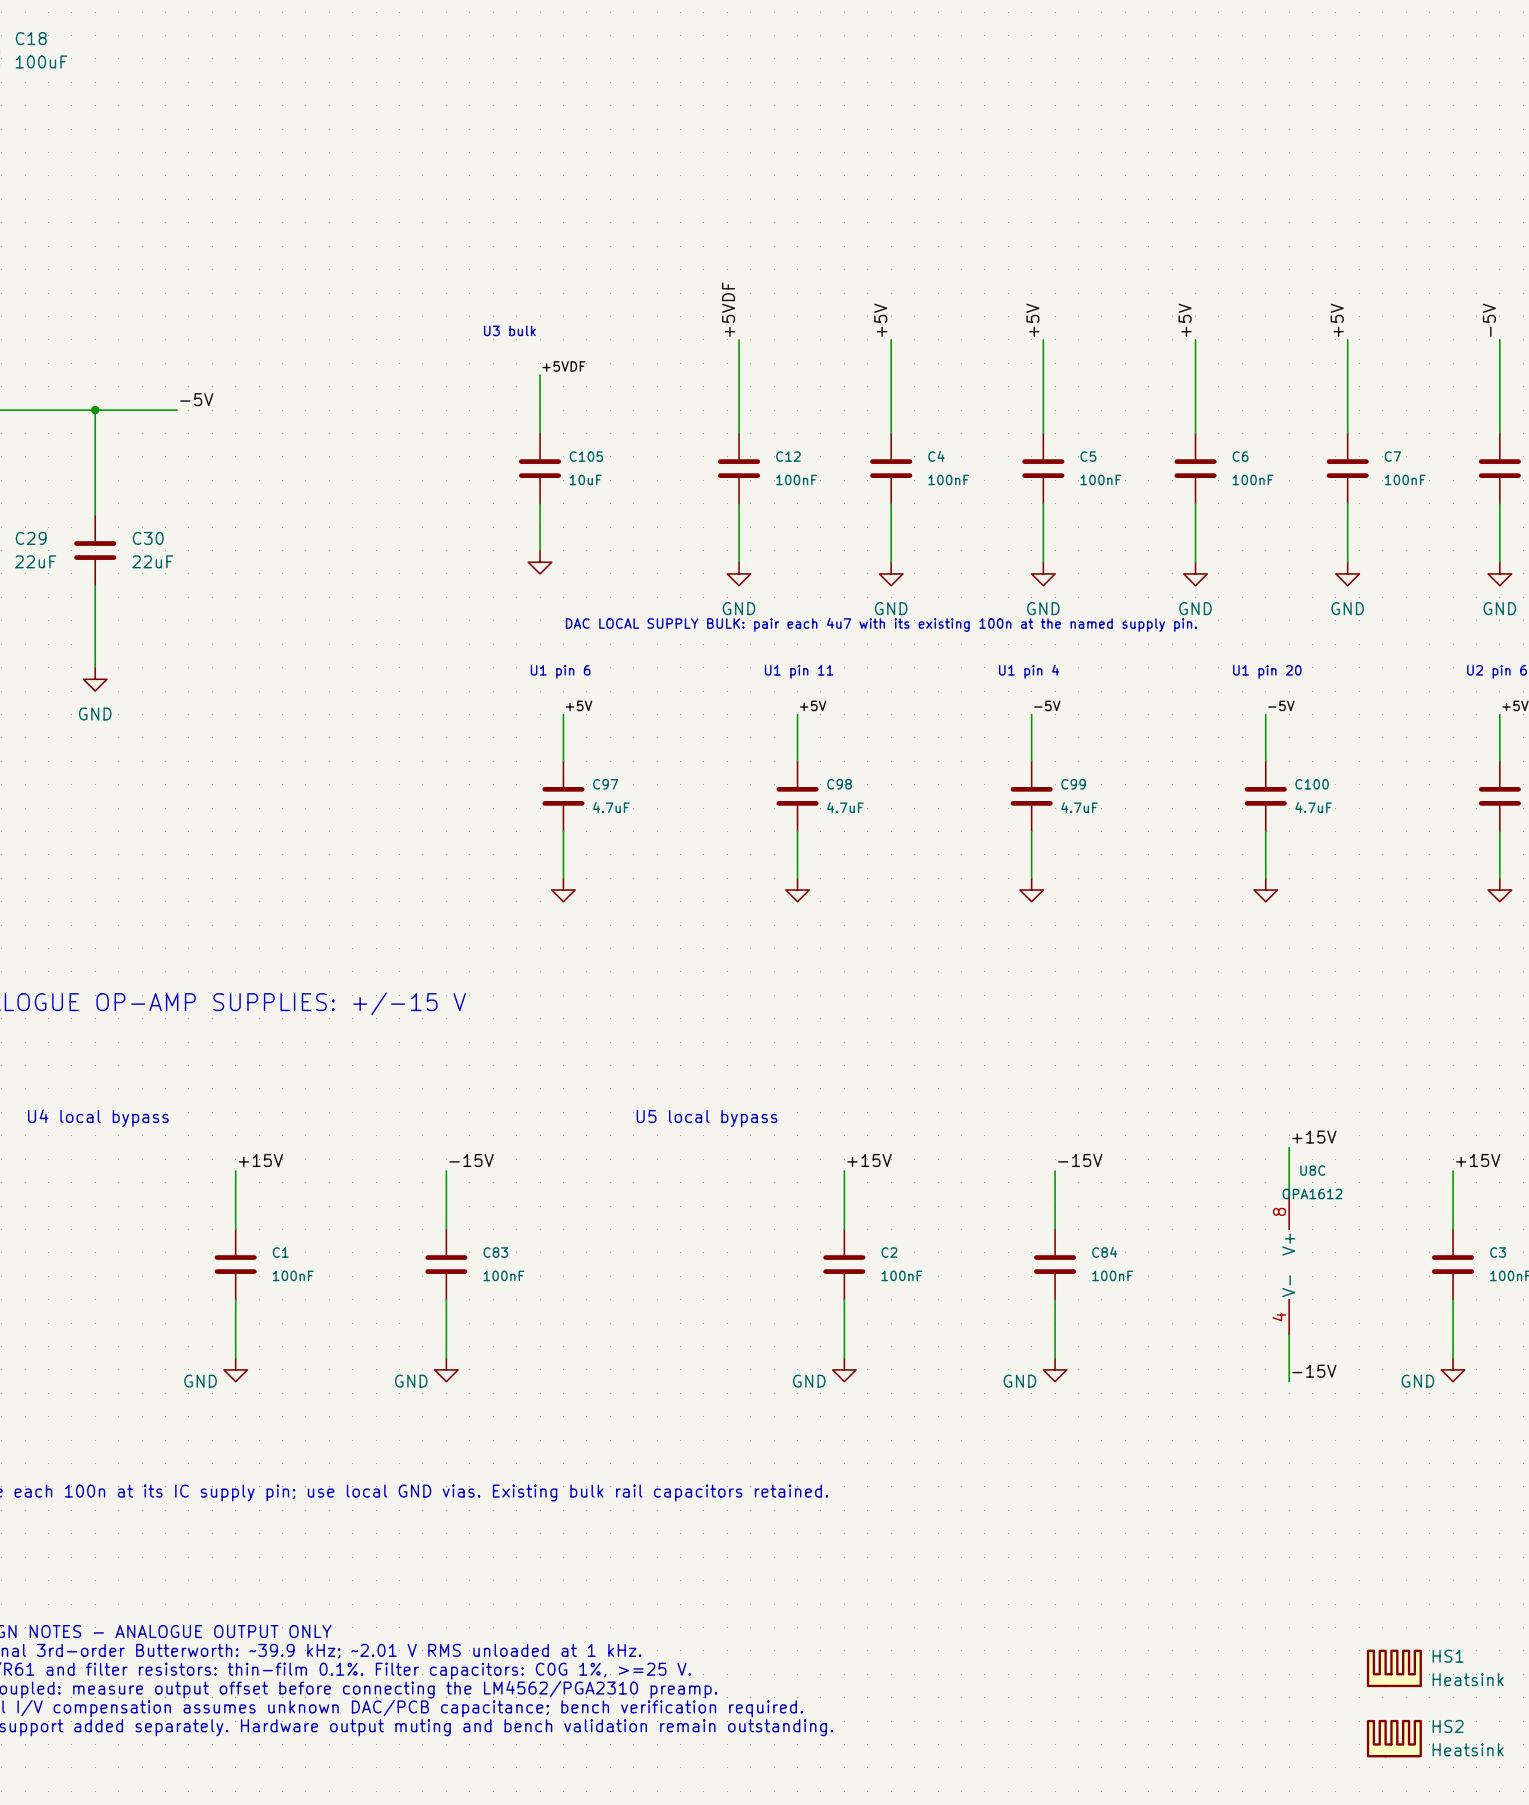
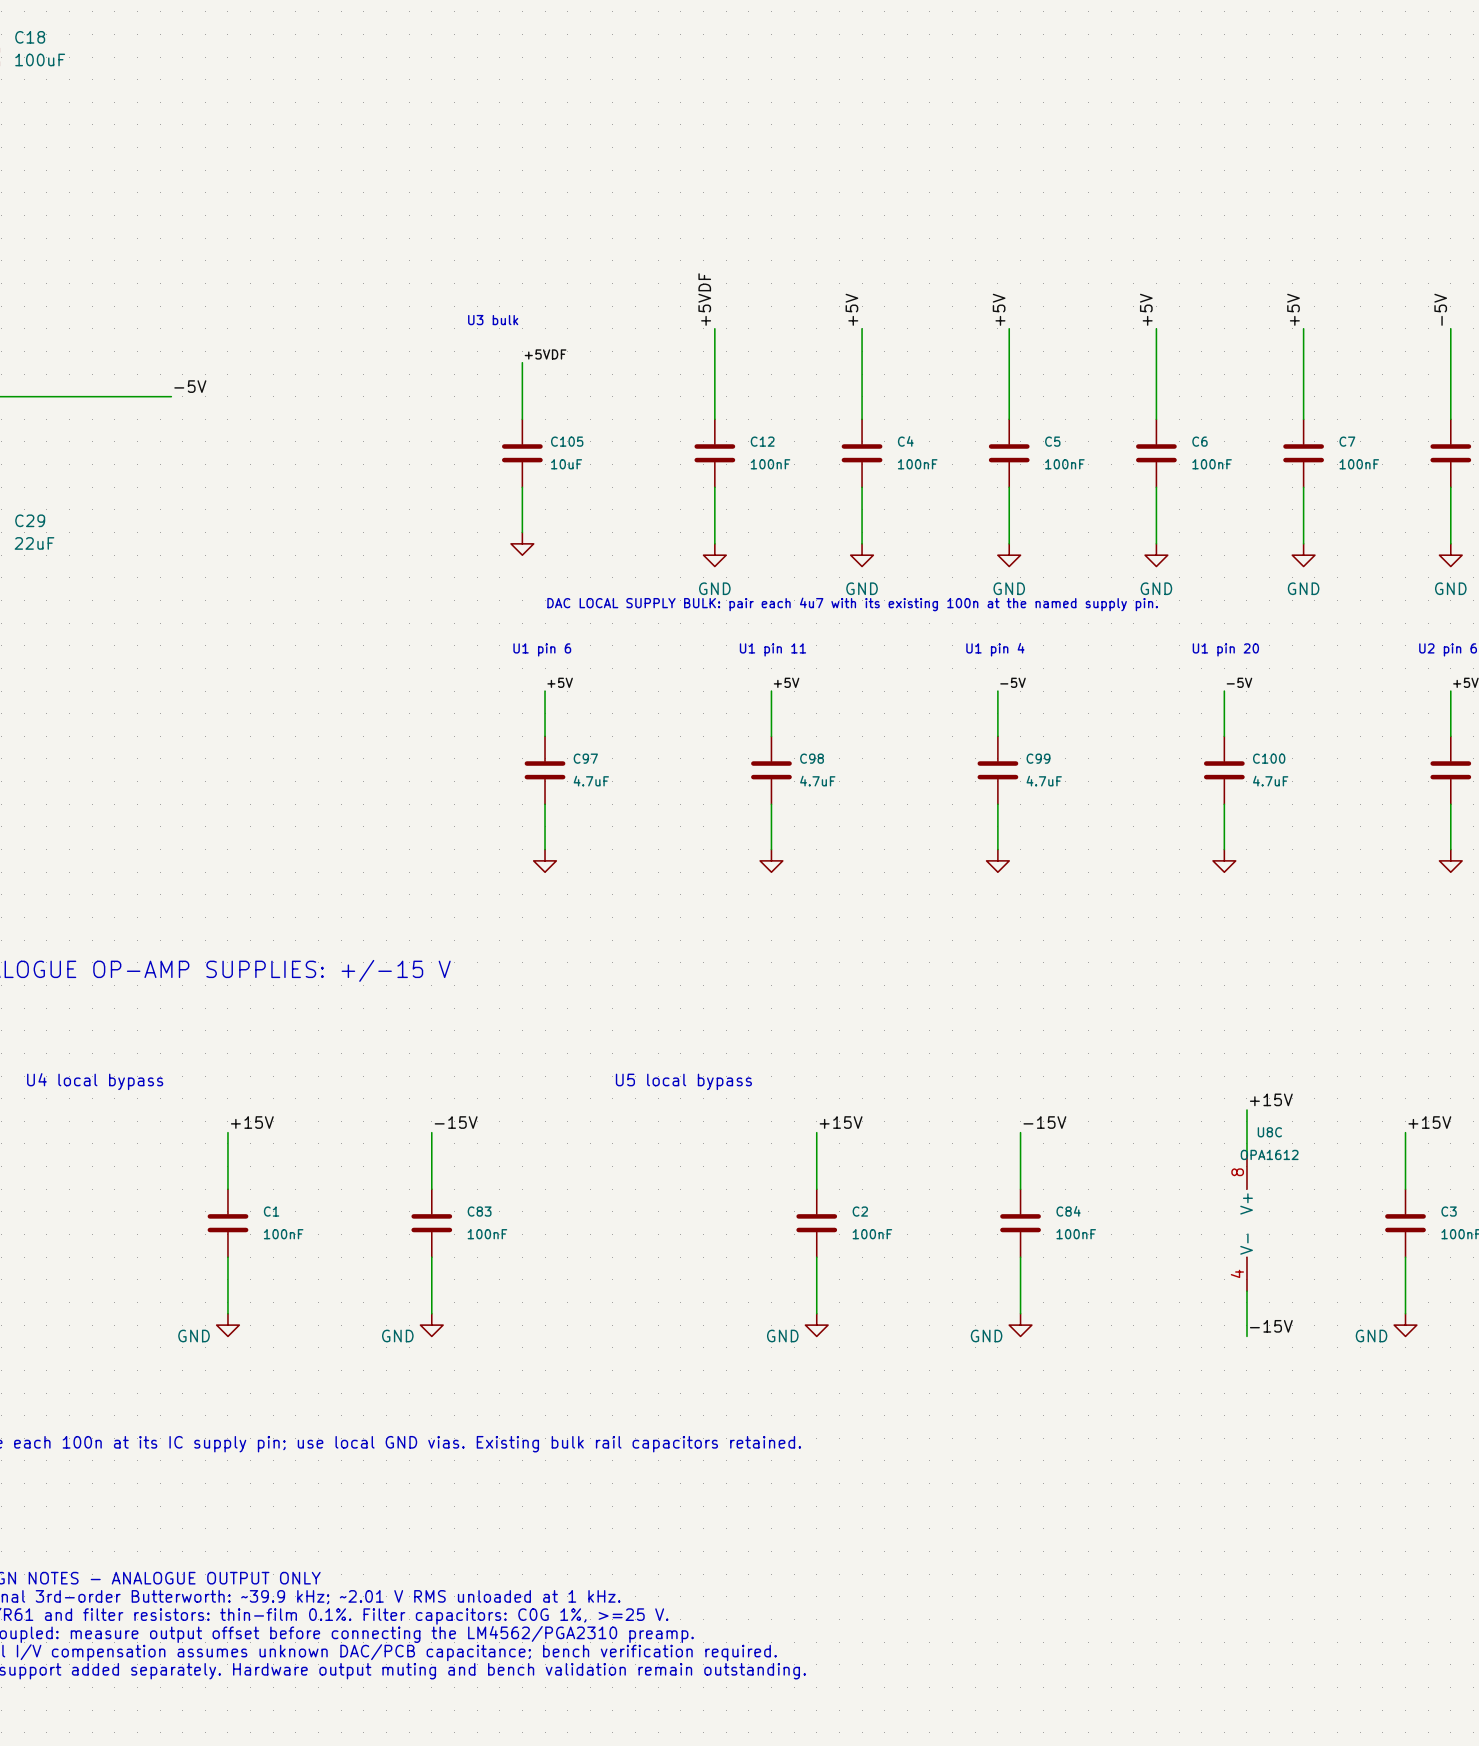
wire: (95, 410) (95, 515) -> none
junction: (95, 410) -> none
C30: 22uF (95, 550) -> none
wire: (95, 585) (95, 667) -> none
power symbol: GND (95, 679) -> none
HS1: Heatsink (1394, 1668) -> none
HS2: Heatsink (1394, 1738) -> none

